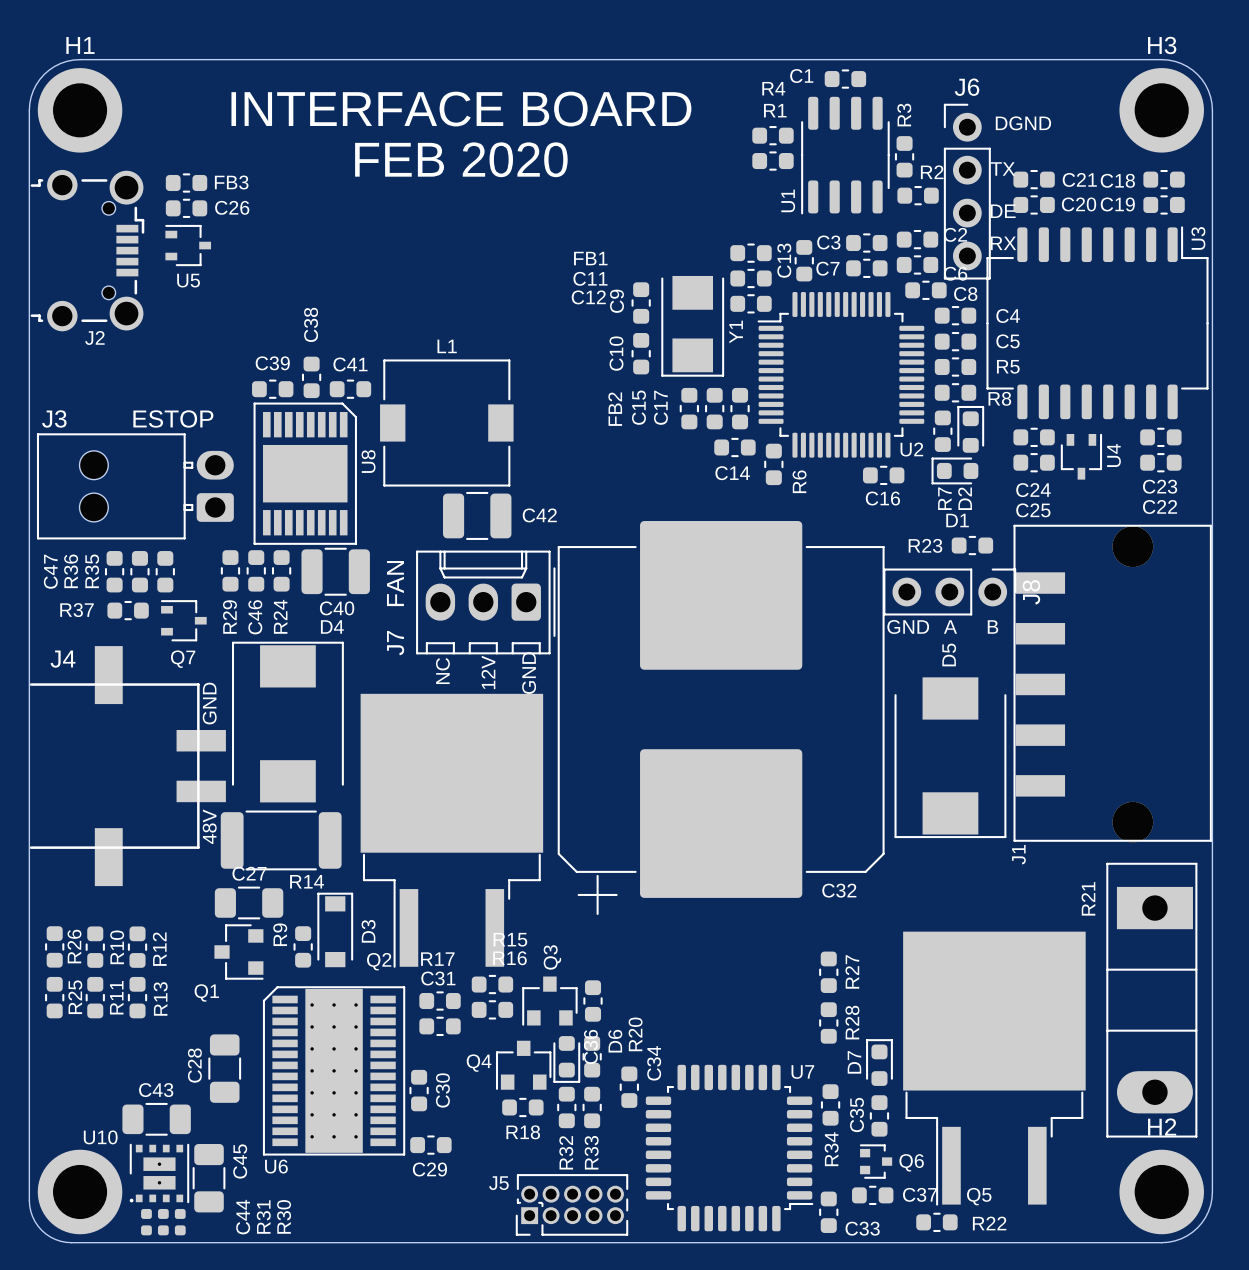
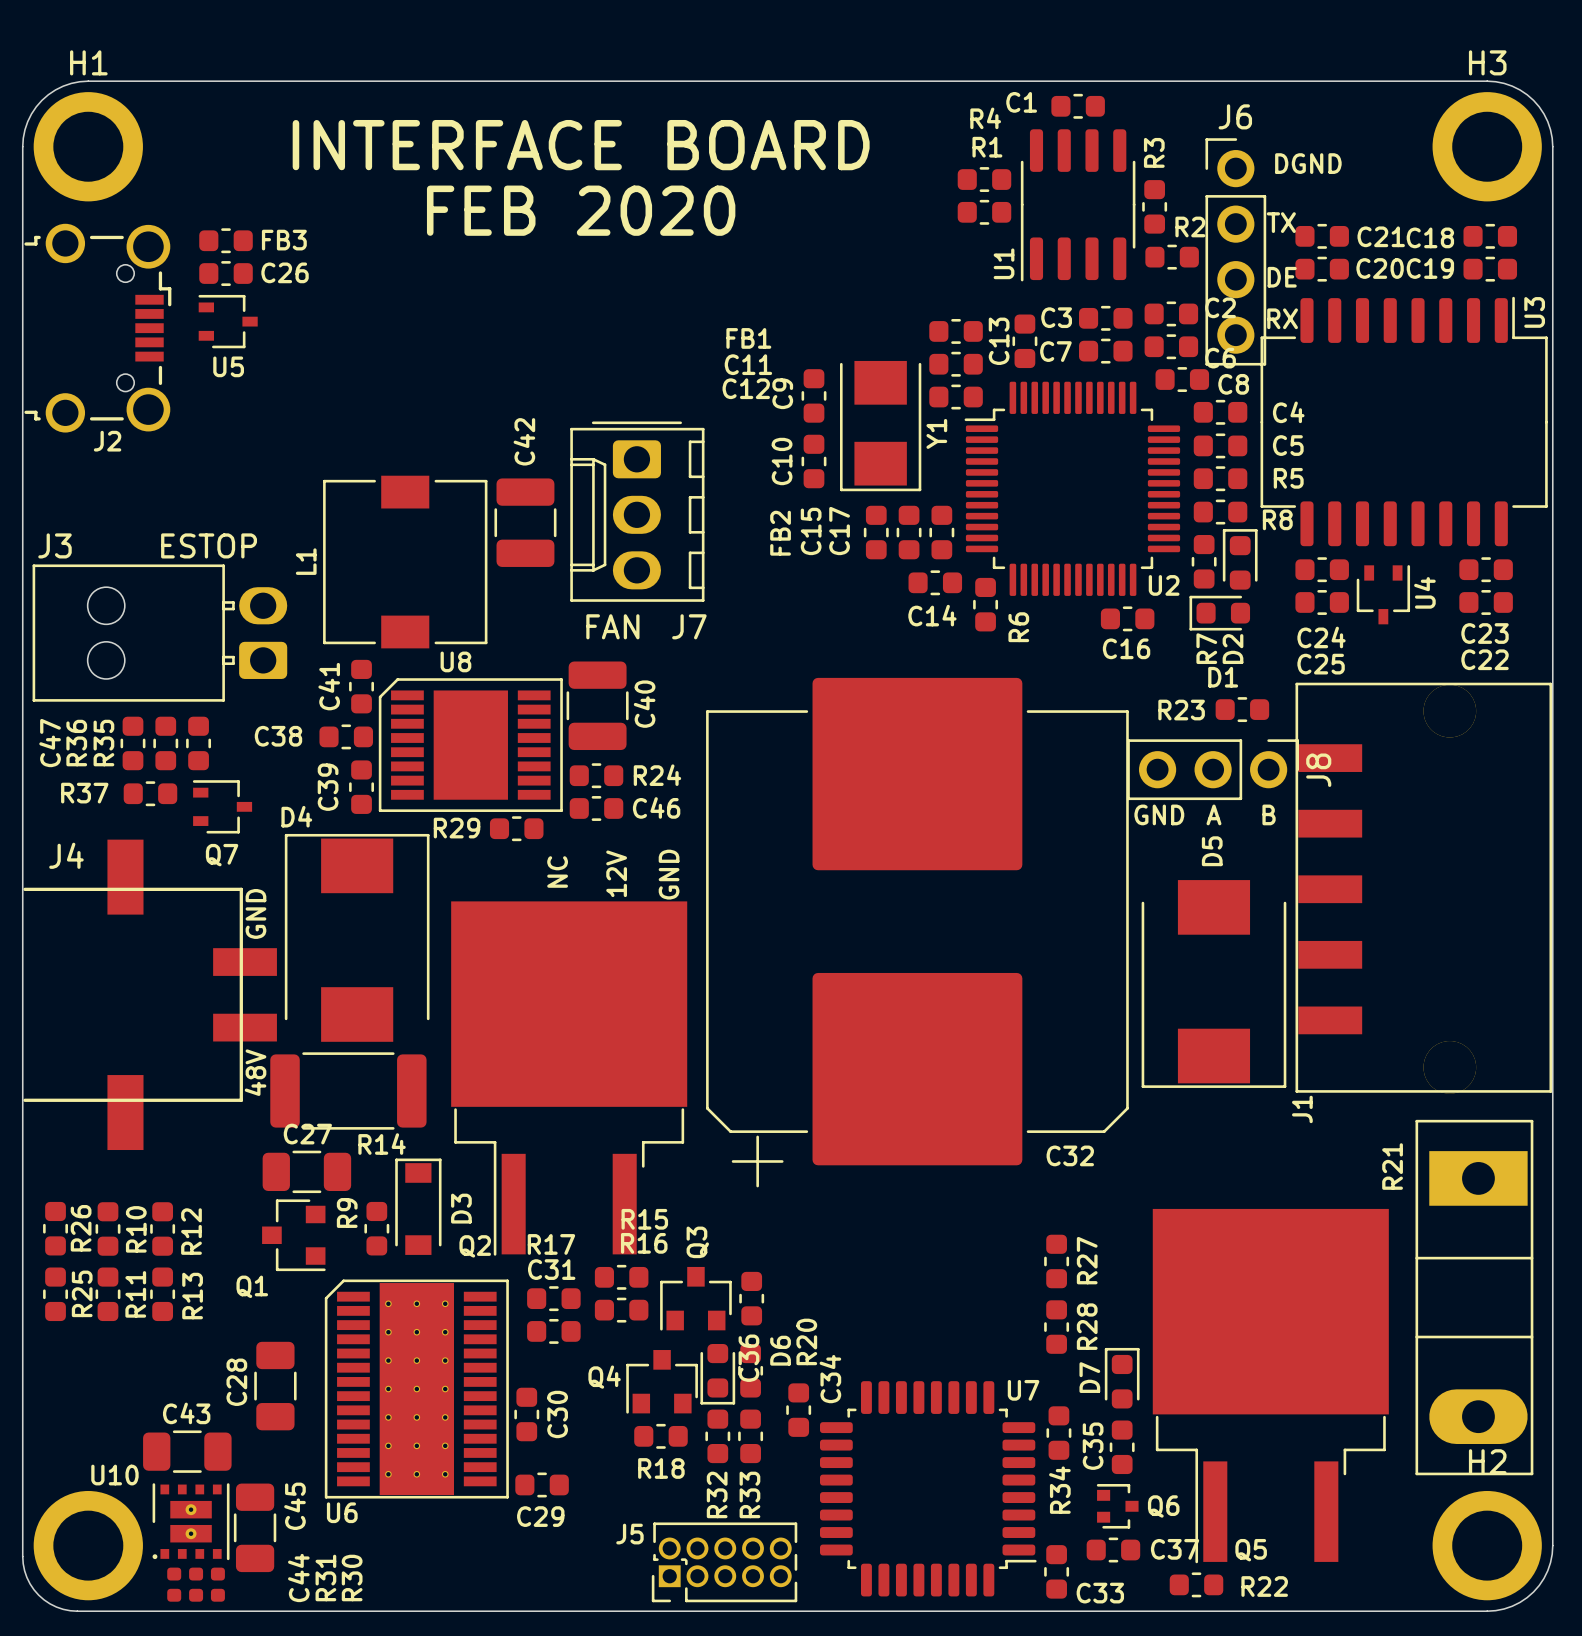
C38 name position: C38 (311, 324) -> C38 (278, 736)
L1 name position: L1 (447, 346) -> L1 (306, 561)
C39 name position: C39 (272, 363) -> C39 (328, 787)
C41 name position: C41 (350, 364) -> C41 (329, 686)
C38 rotation: 0° (311, 377) -> 90° clockwise (346, 736)
C38 position: (311, 377) -> (346, 736)
C39 rotation: 0° (272, 389) -> 90° clockwise (361, 787)
C39 position: (272, 389) -> (361, 787)
C41 rotation: 0° (350, 389) -> 90° clockwise (361, 686)
C41 position: (350, 389) -> (361, 686)
L1 rotation: 0° (446, 422) -> 90° clockwise (405, 562)
L1 position: (446, 422) -> (405, 562)
U8 rotation: 0° (305, 473) -> 90° counterclockwise (470, 745)
U8 position: (305, 473) -> (470, 745)
C42 rotation: 0° (477, 515) -> 90° clockwise (525, 522)
C42 position: (477, 515) -> (525, 522)
C42 name position: C42 (539, 515) -> C42 (524, 441)
R29 rotation: 0° (230, 570) -> 90° clockwise (516, 828)
R29 position: (230, 570) -> (516, 828)
C46 rotation: 0° (256, 570) -> 90° clockwise (596, 808)
C46 position: (256, 570) -> (596, 808)
R24 rotation: 0° (281, 570) -> 90° clockwise (596, 775)
R24 position: (281, 570) -> (596, 775)
C40 rotation: 0° (335, 571) -> 90° clockwise (597, 705)
C40 position: (335, 571) -> (597, 705)
J7 rotation: 0° (485, 602) -> 90° counterclockwise (637, 511)
J7 position: (485, 602) -> (637, 511)
C40 name position: C40 (337, 608) -> C40 (644, 704)
R24 name position: R24 (280, 616) -> R24 (657, 775)
C46 name position: C46 (255, 617) -> C46 (656, 807)
D4 name position: D4 (332, 626) -> D4 (296, 816)

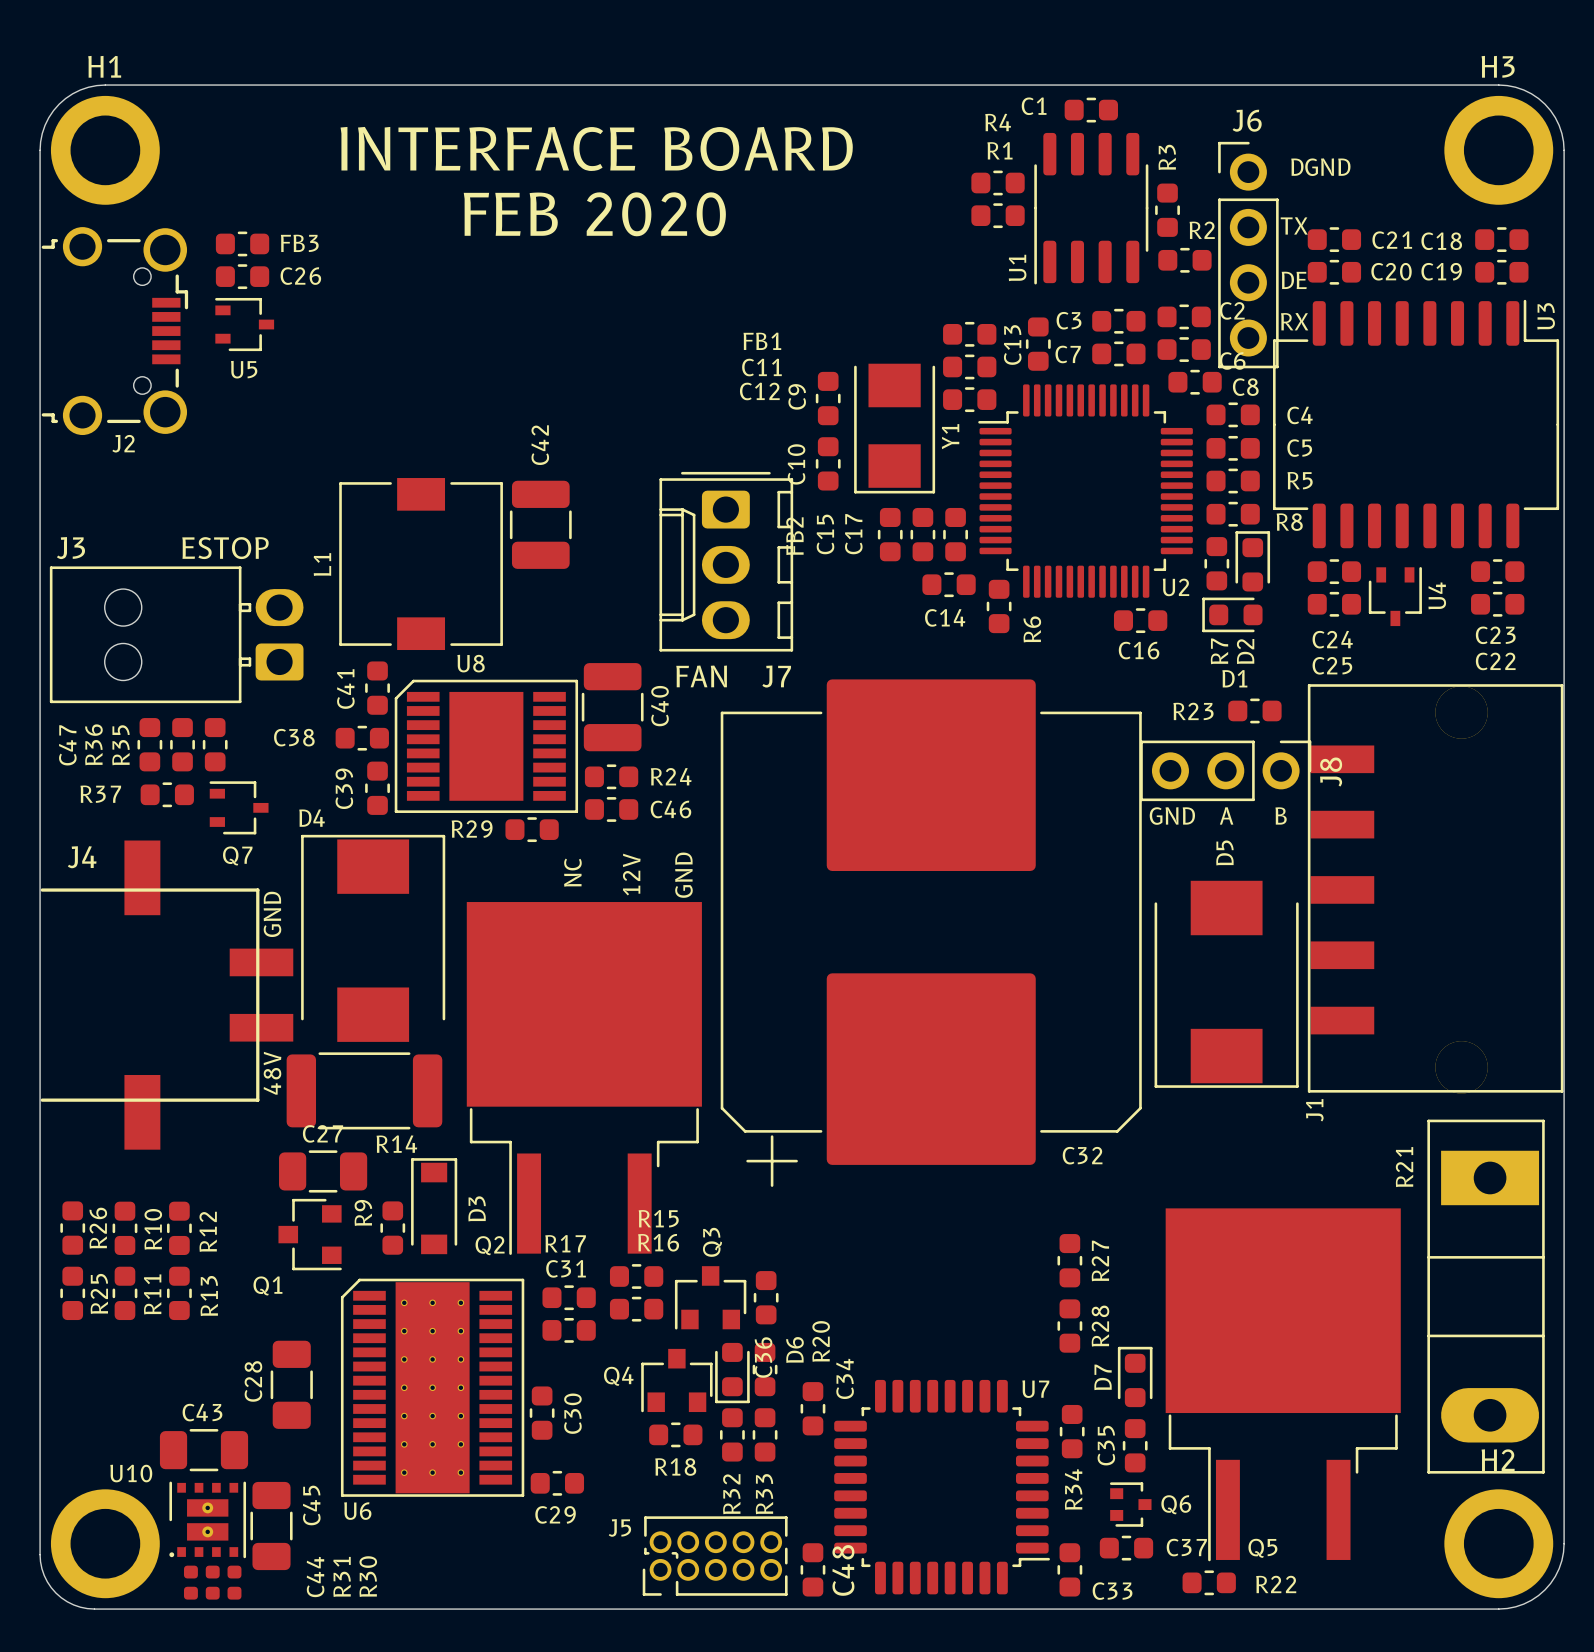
J7 position: (637, 511) -> (726, 561)
J5 footprint: [651, 1522, 798, 1603] -> [642, 1516, 788, 1596]
C48: none -> (812, 1569)

